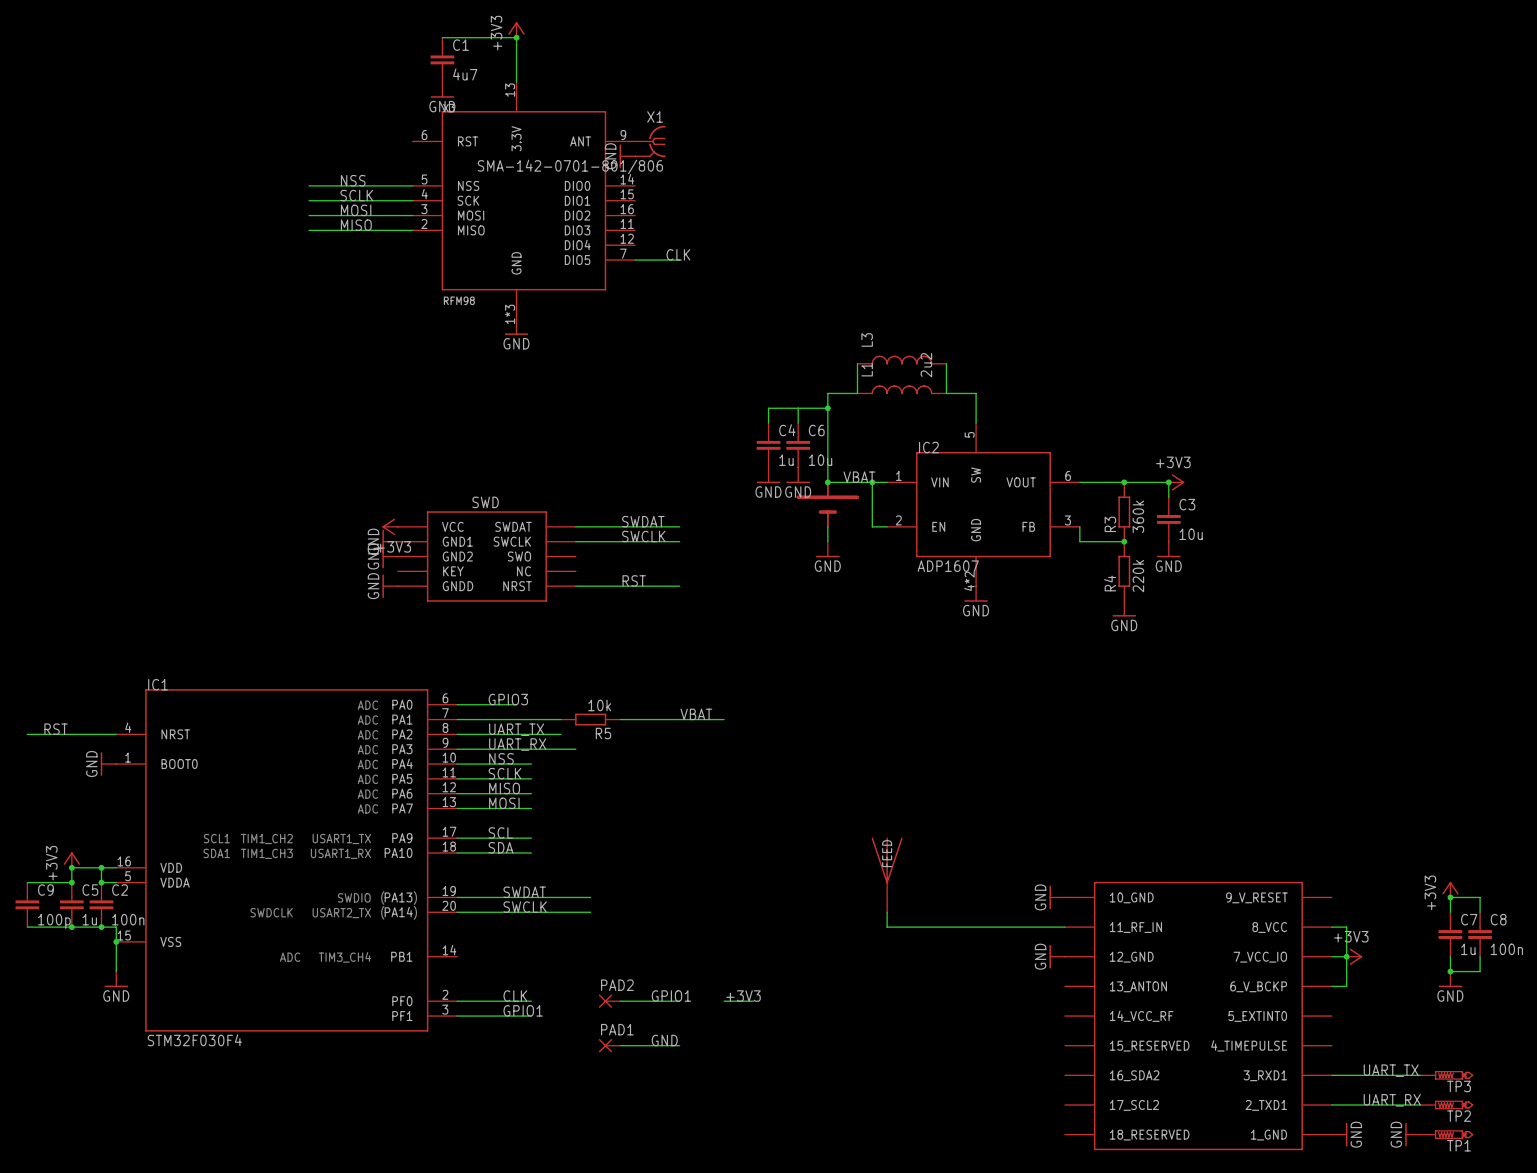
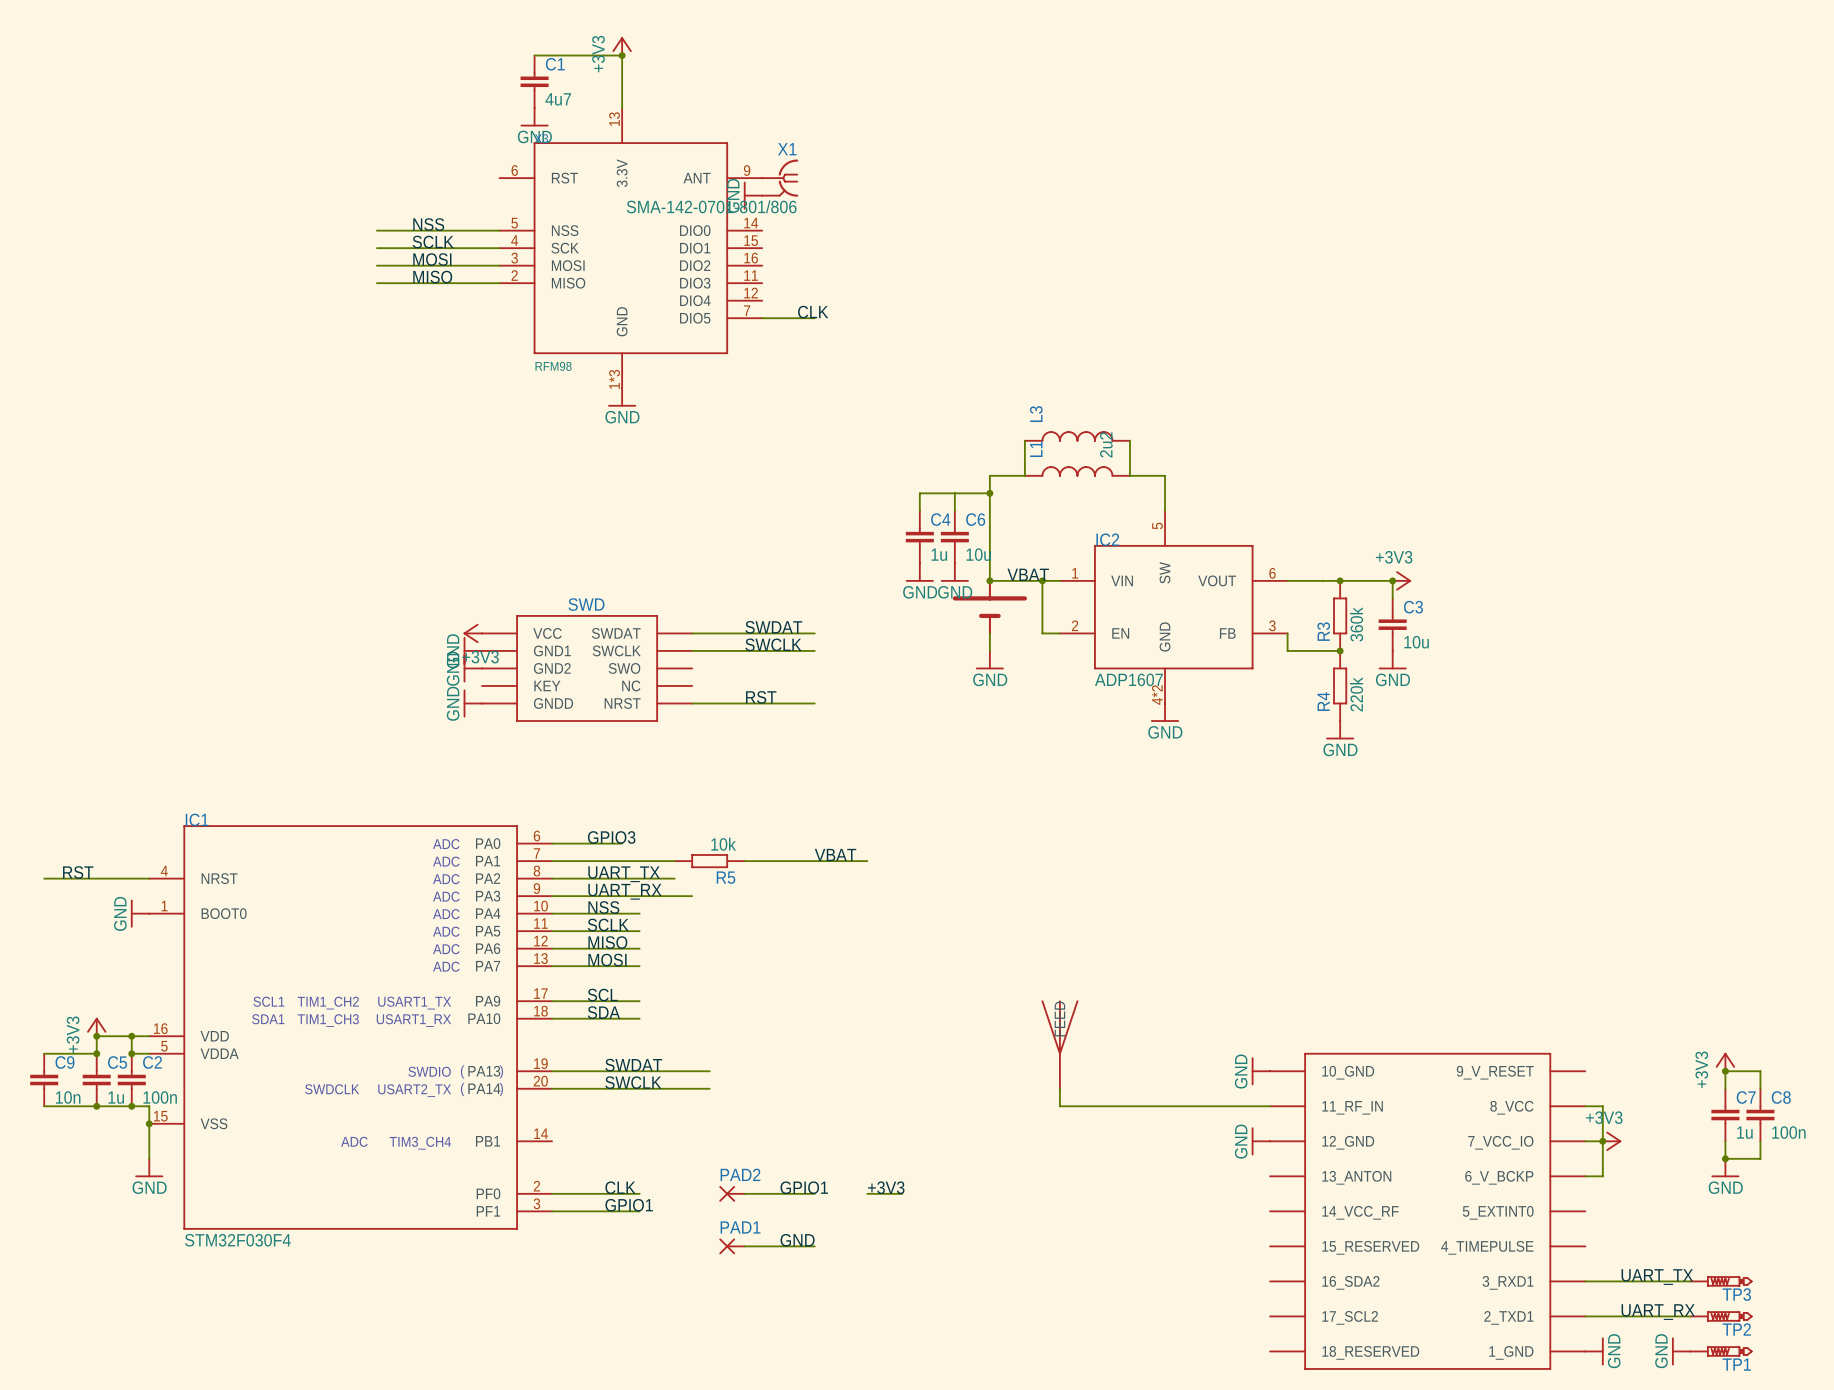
C9 value: 100p (54, 921) -> 10n (68, 1097)

